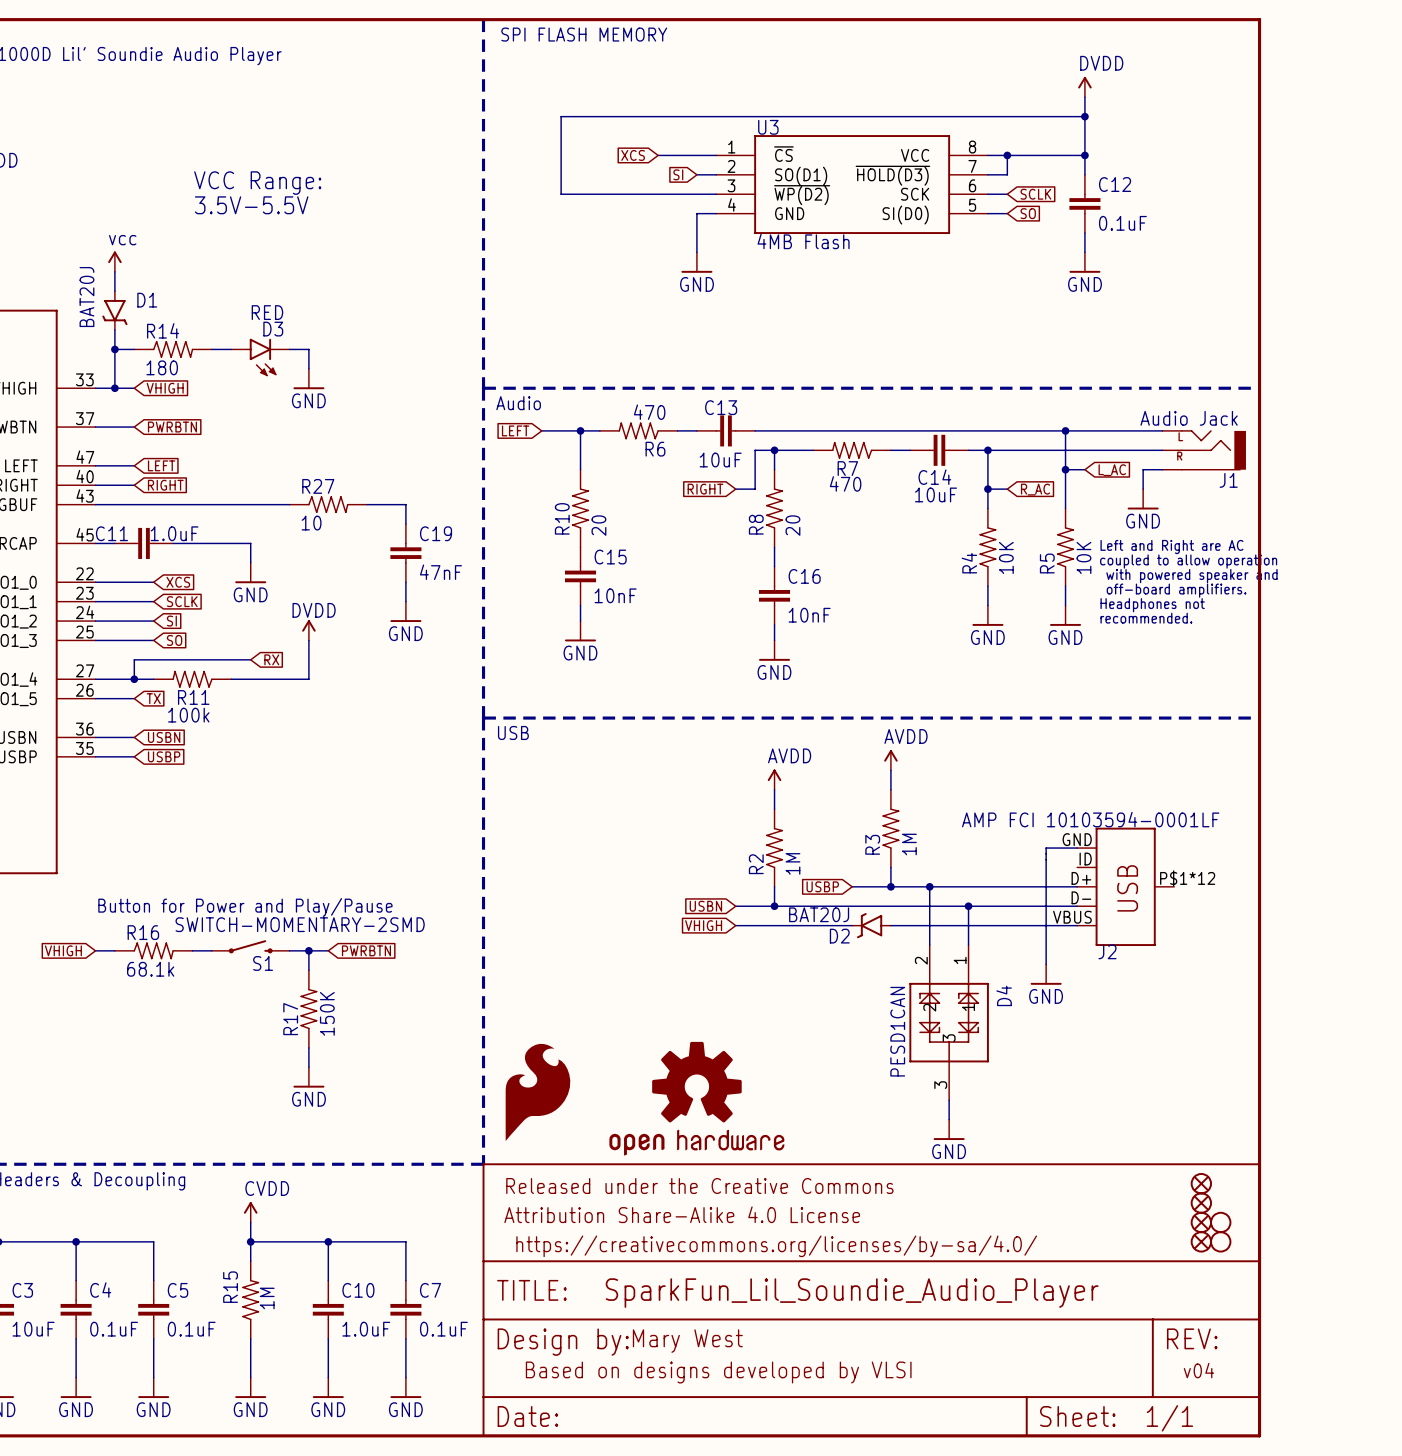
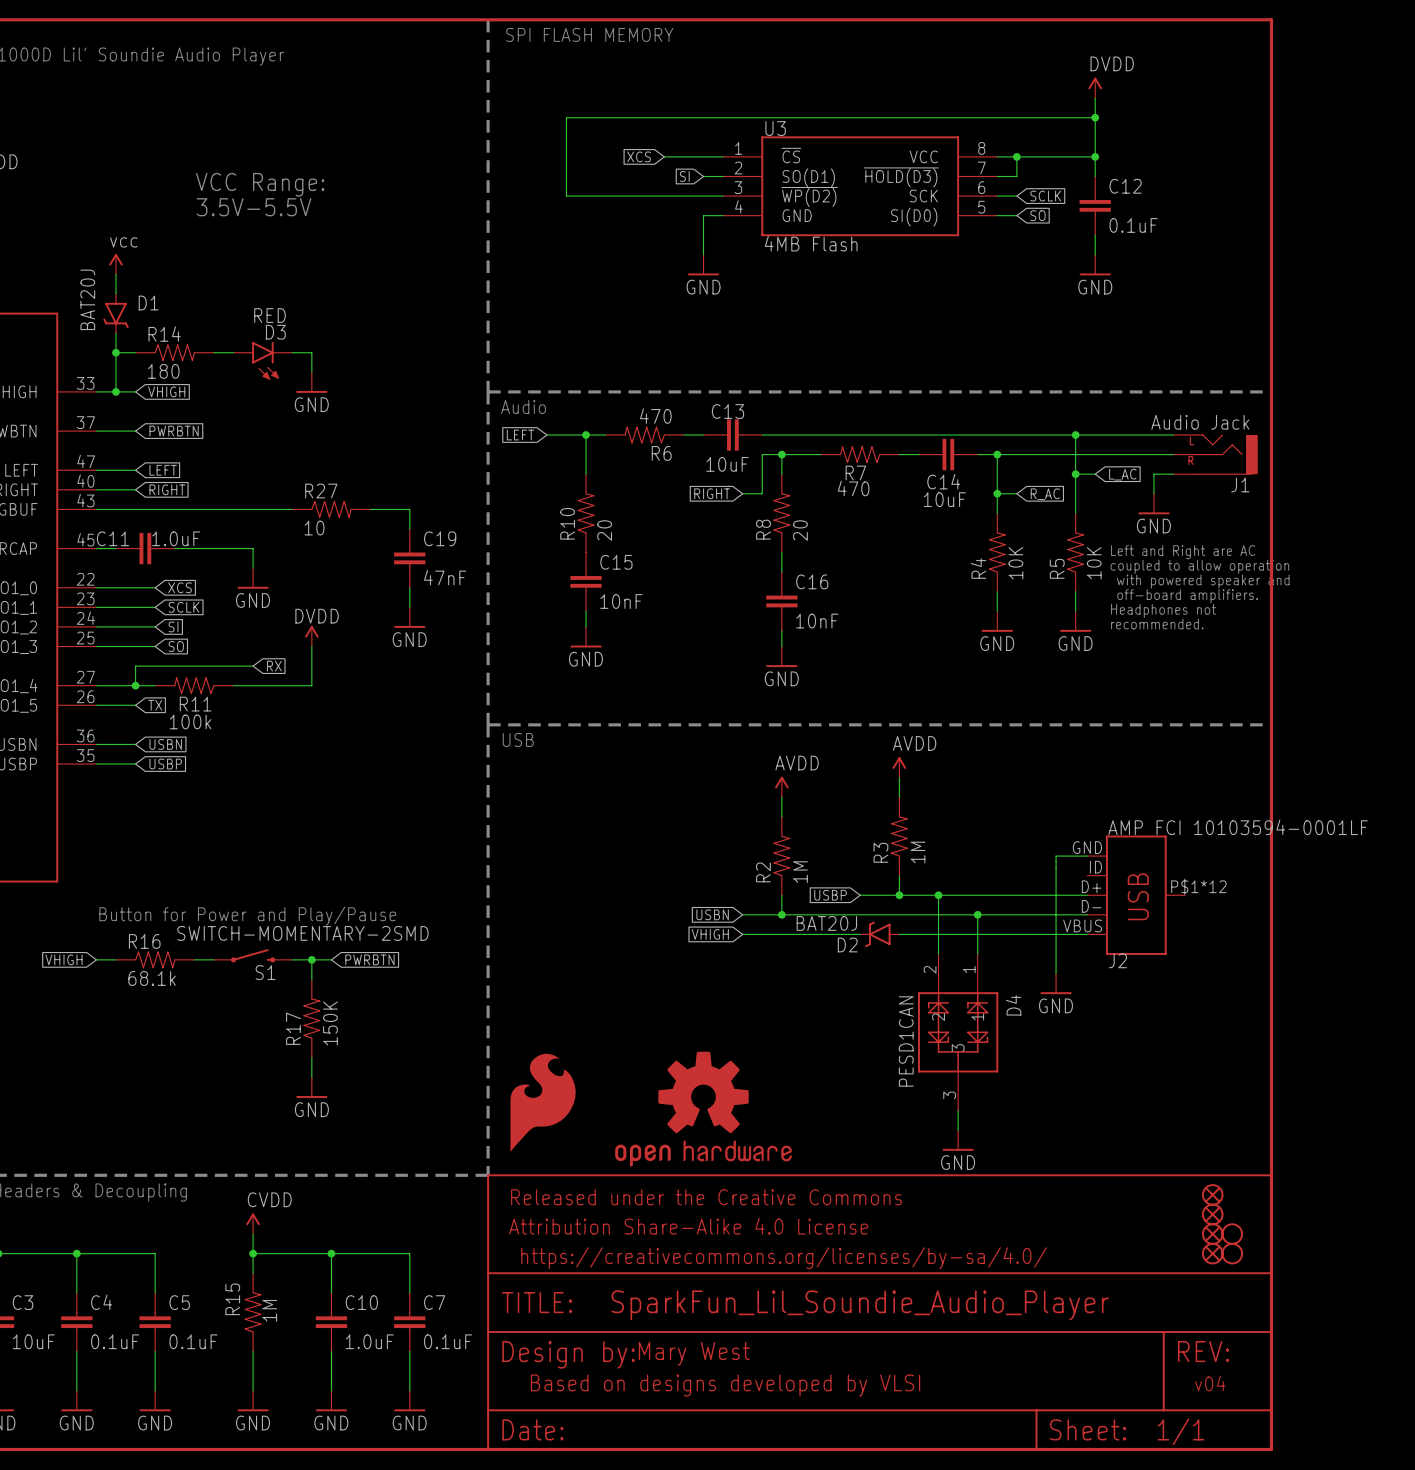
J2 value position: AMP FCI 10103594-0001LF (1090, 819) -> AMP FCI 10103594-0001LF (1238, 827)

